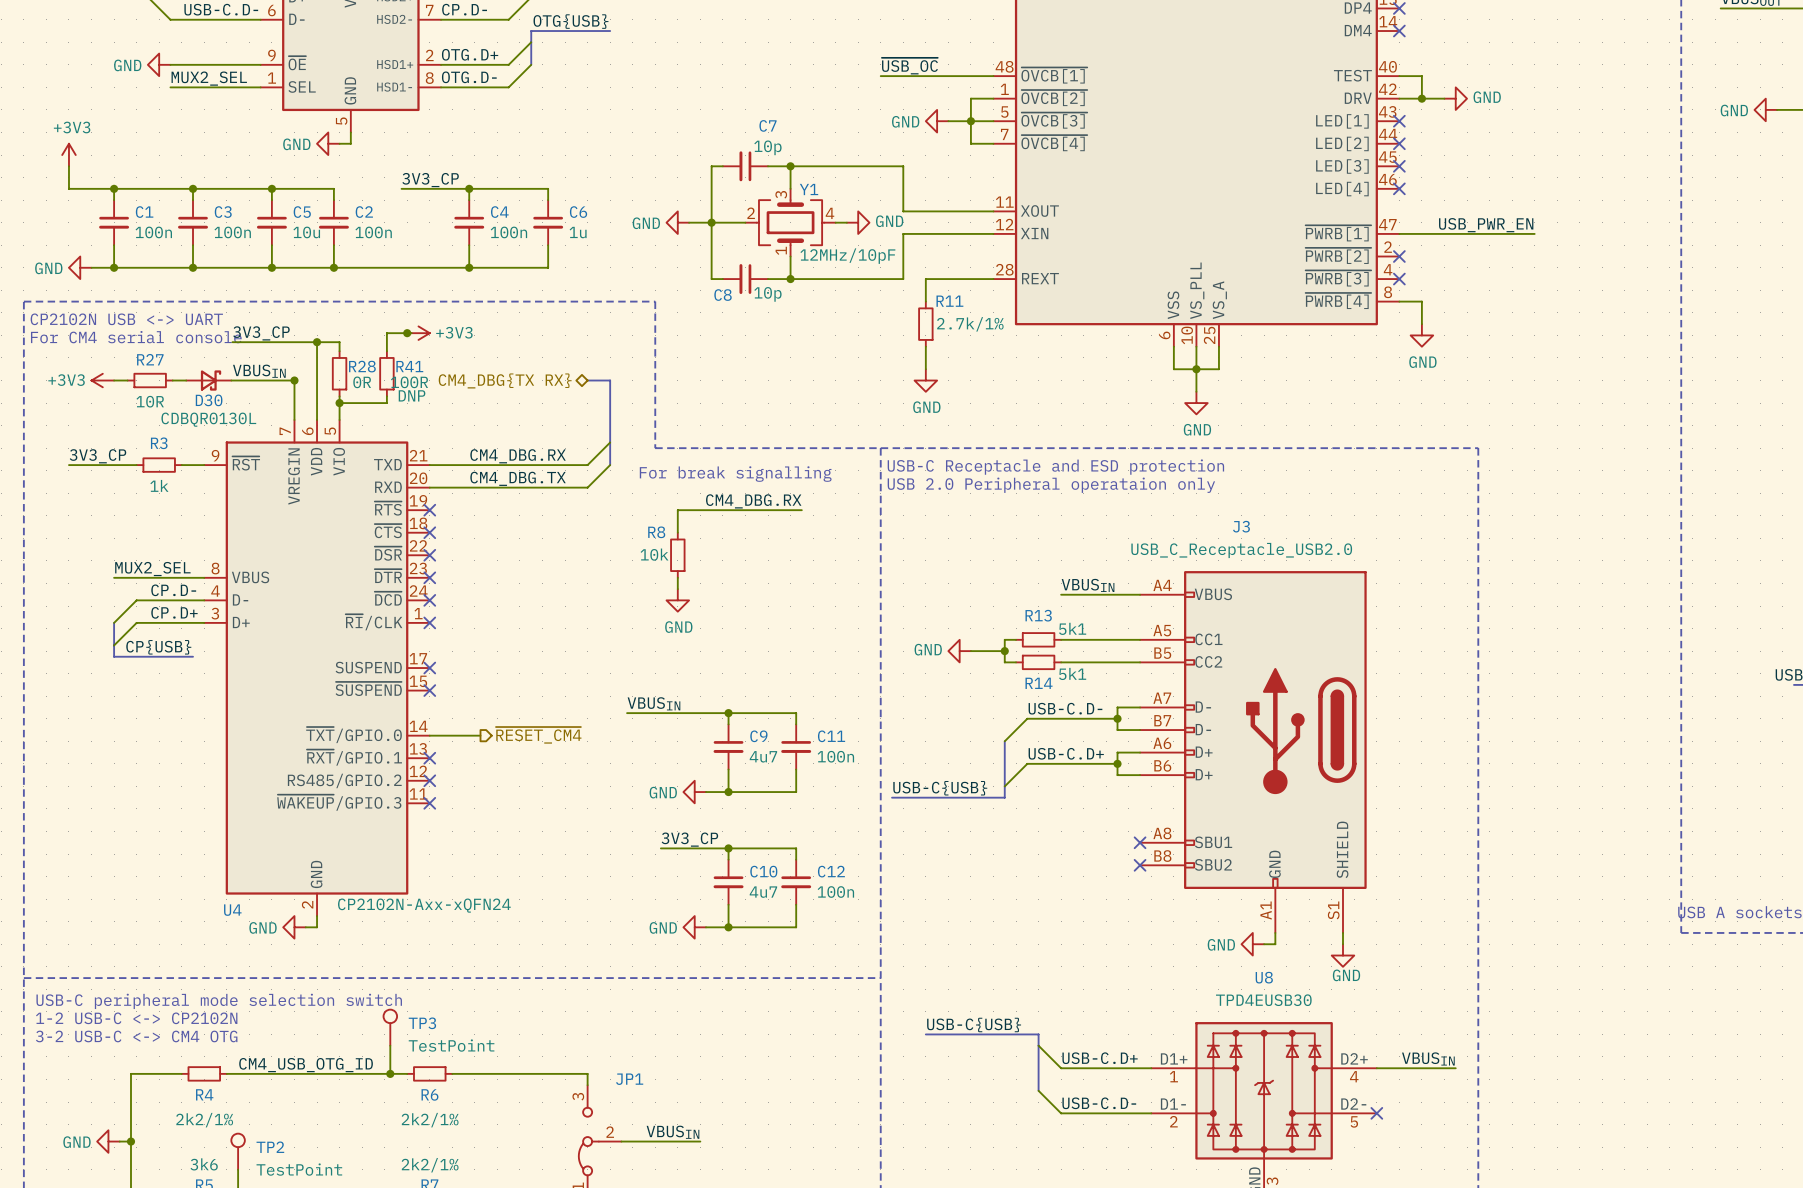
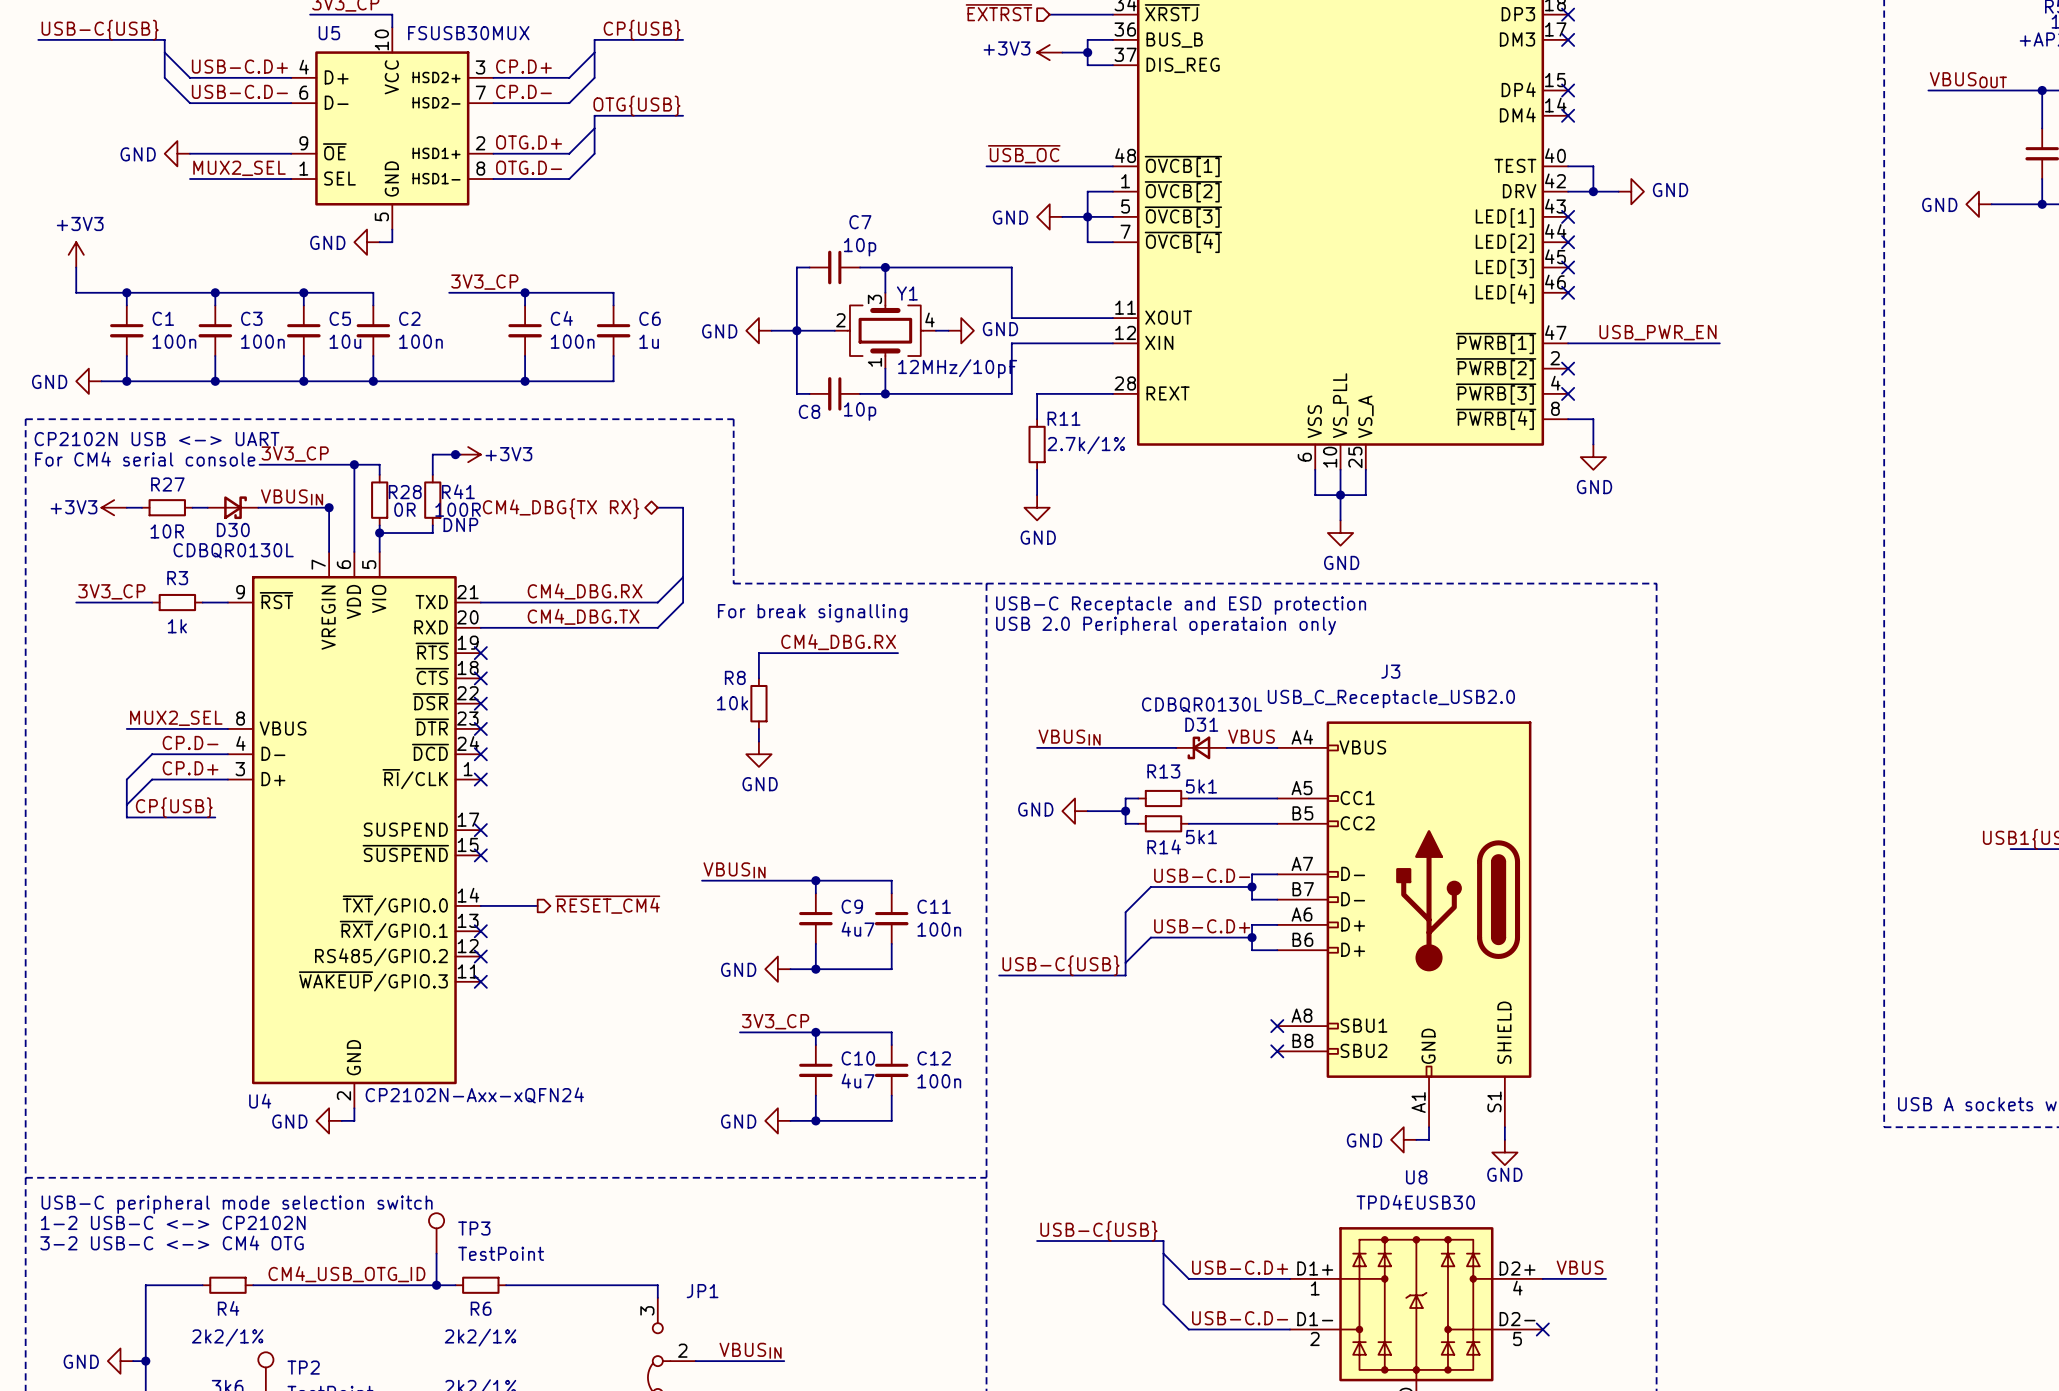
label: none -> VBUS (1251, 736)
label position: VBUSIN (1088, 585) -> VBUSIN (1069, 737)
wire: none -> (1037, 747) (1176, 747)
D31: none -> CDBQR0130L (1201, 747)
label: VBUSIN (1428, 1058) -> VBUS (1580, 1267)
wire: (1433, 1068) (1455, 1068) -> none

